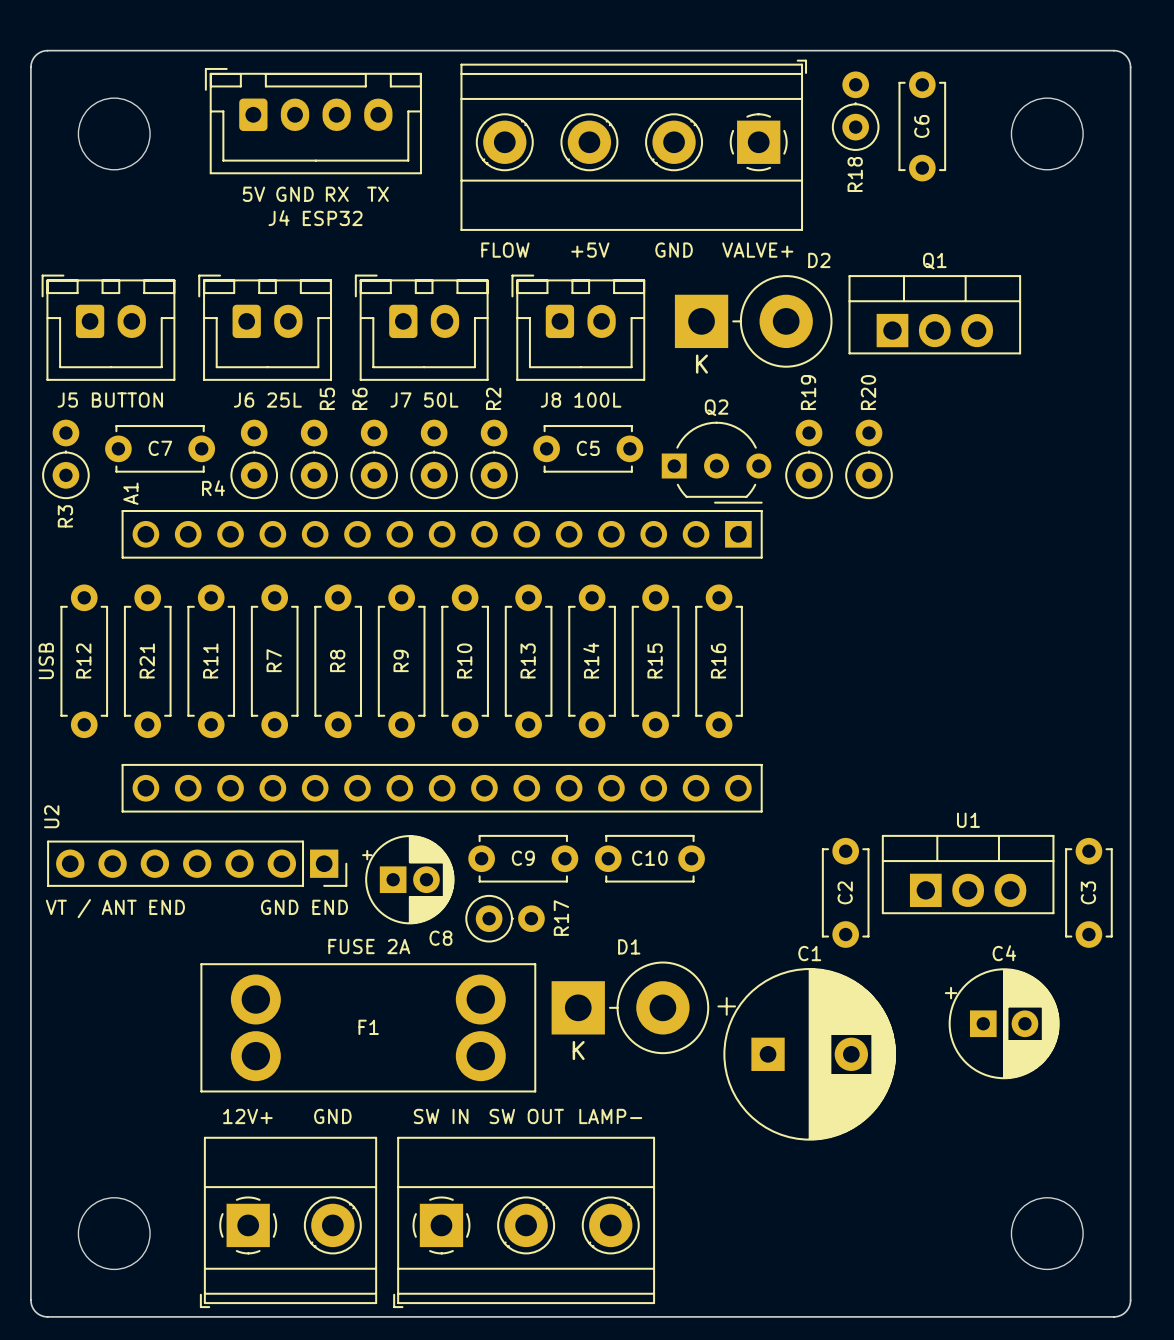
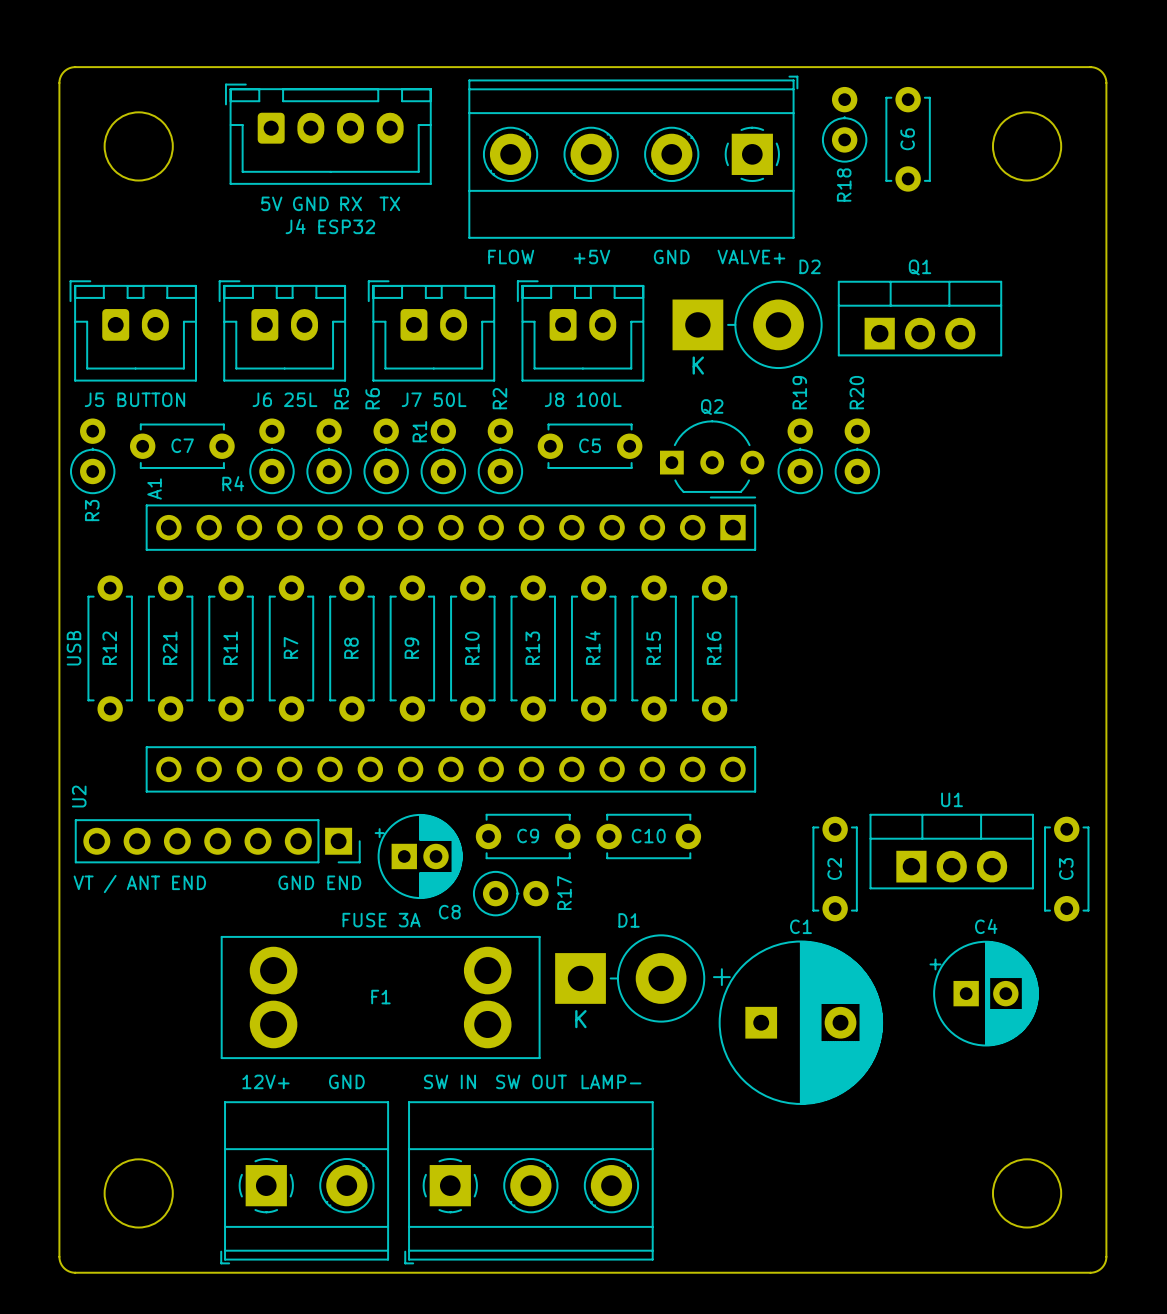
R1 name: none -> R1 (419, 431)
text: FUSE 2A (369, 946) -> FUSE 3A (381, 920)

